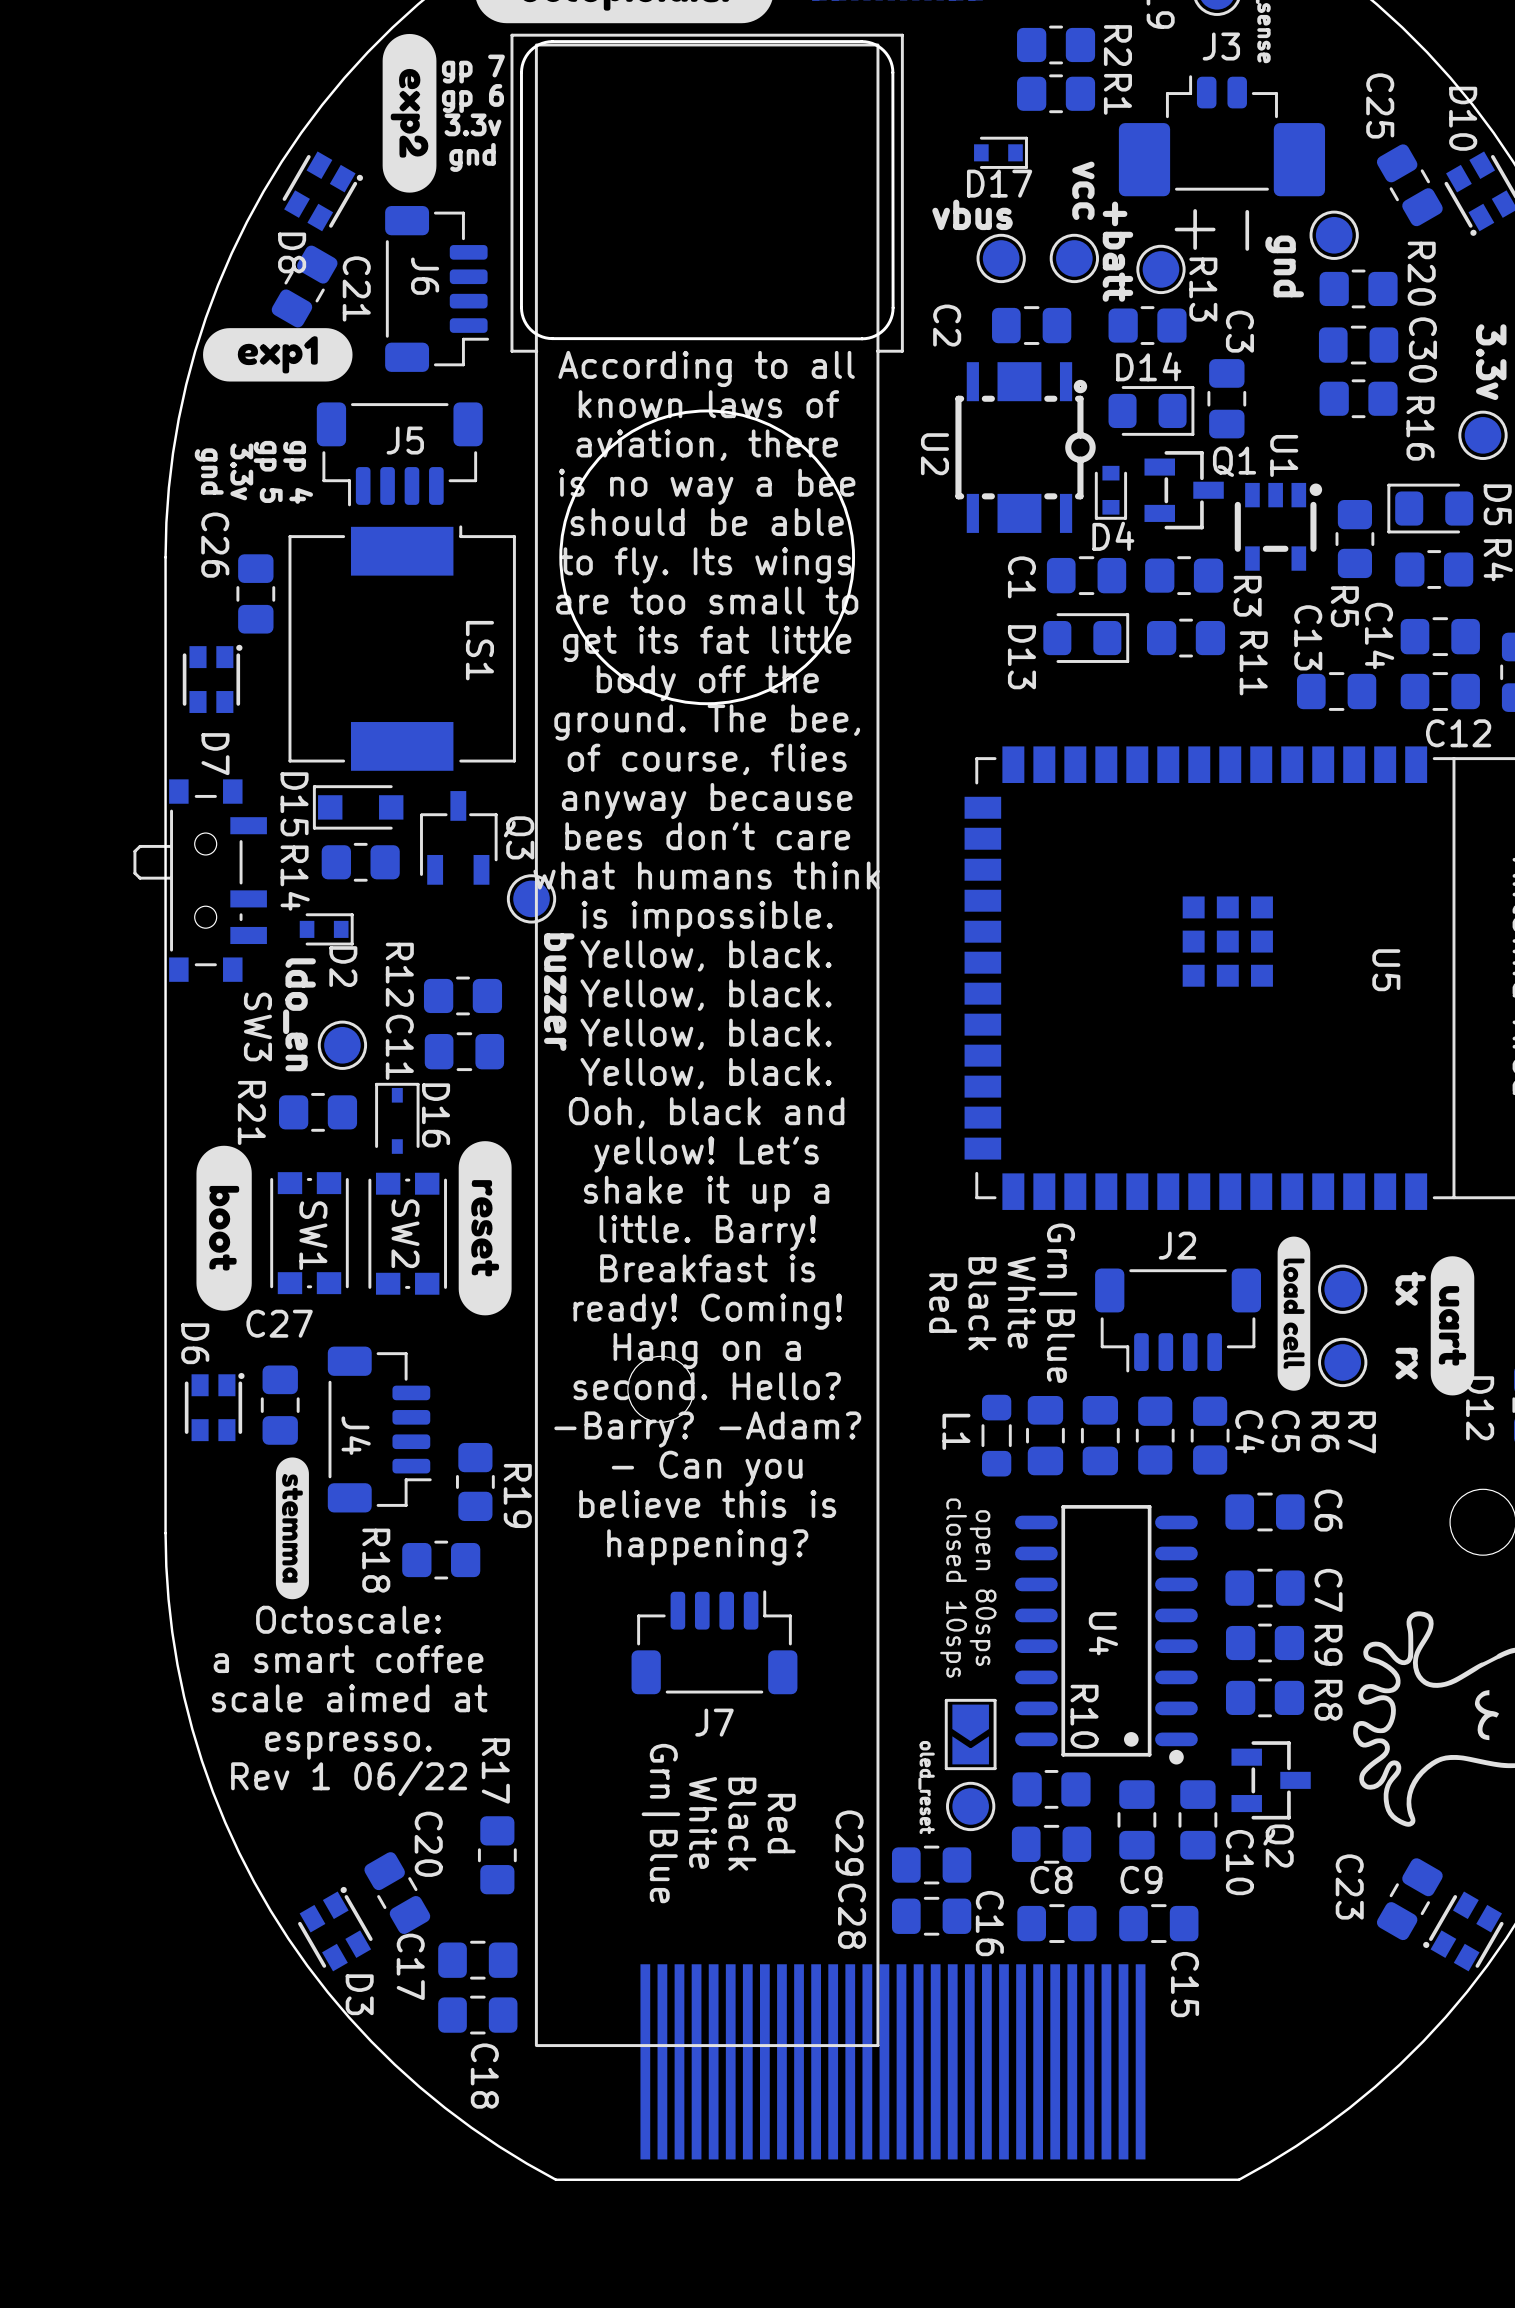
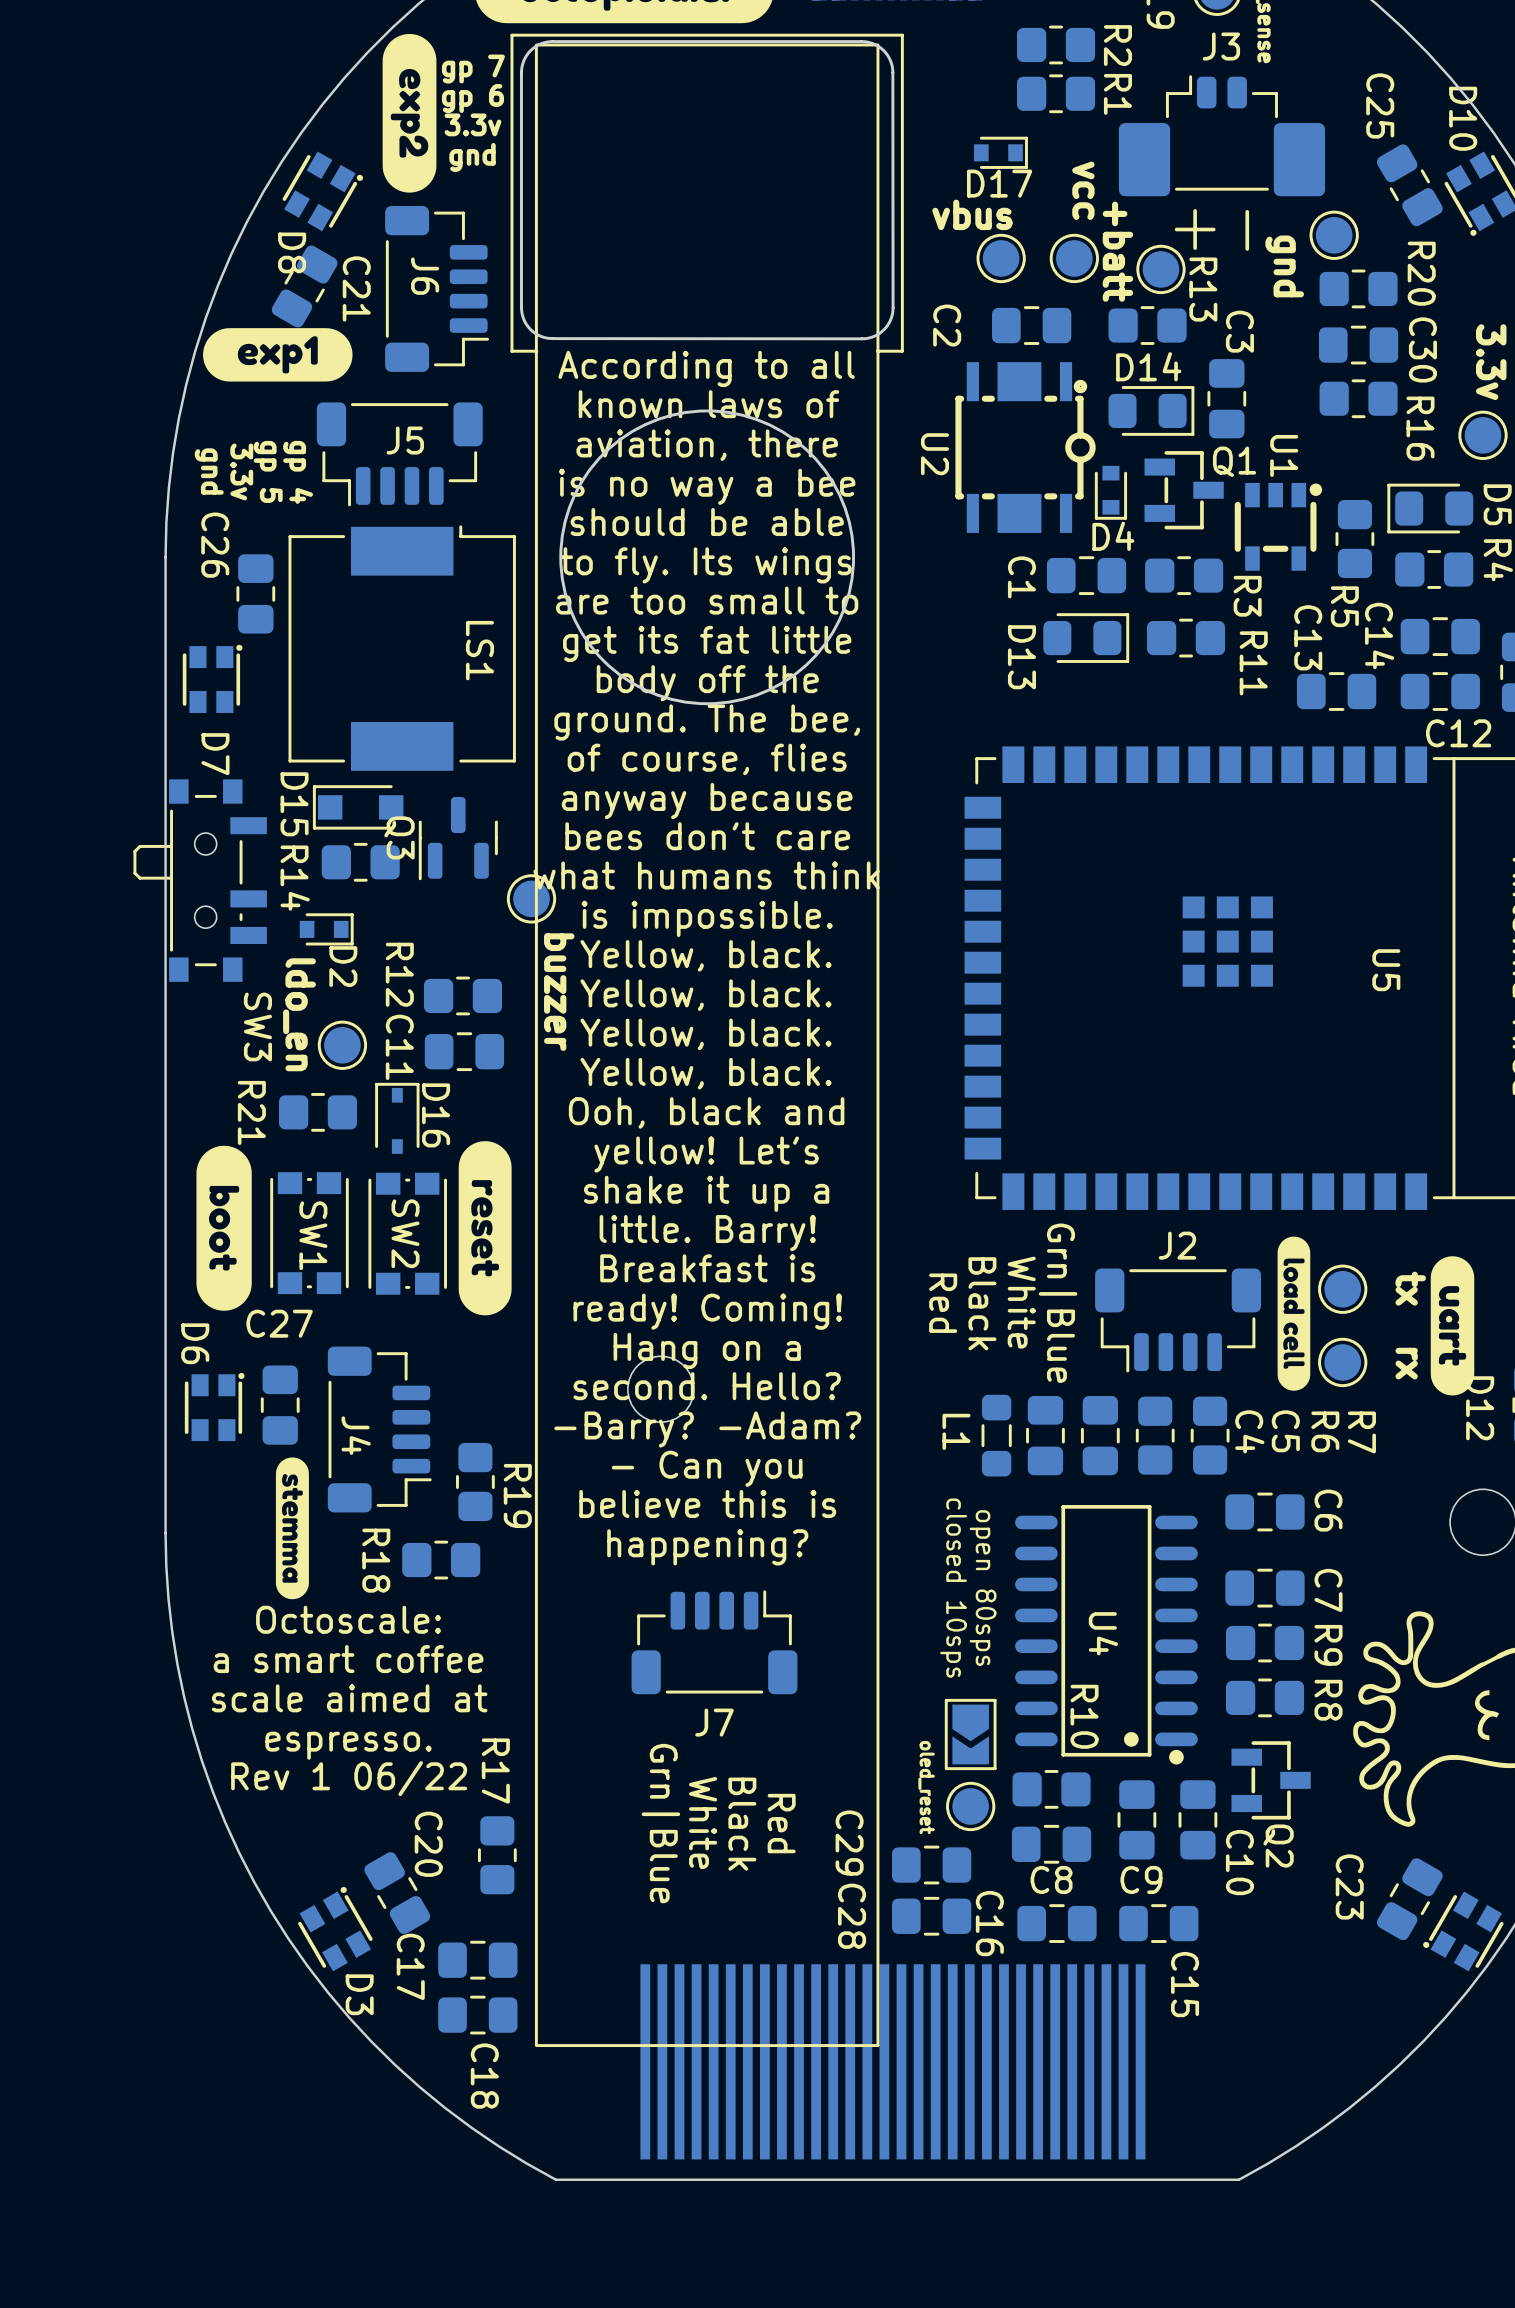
Q3 footprint: [420, 791, 498, 885] -> [418, 797, 498, 881]
Q3 name position: Q3 (519, 837) -> Q3 (399, 837)

